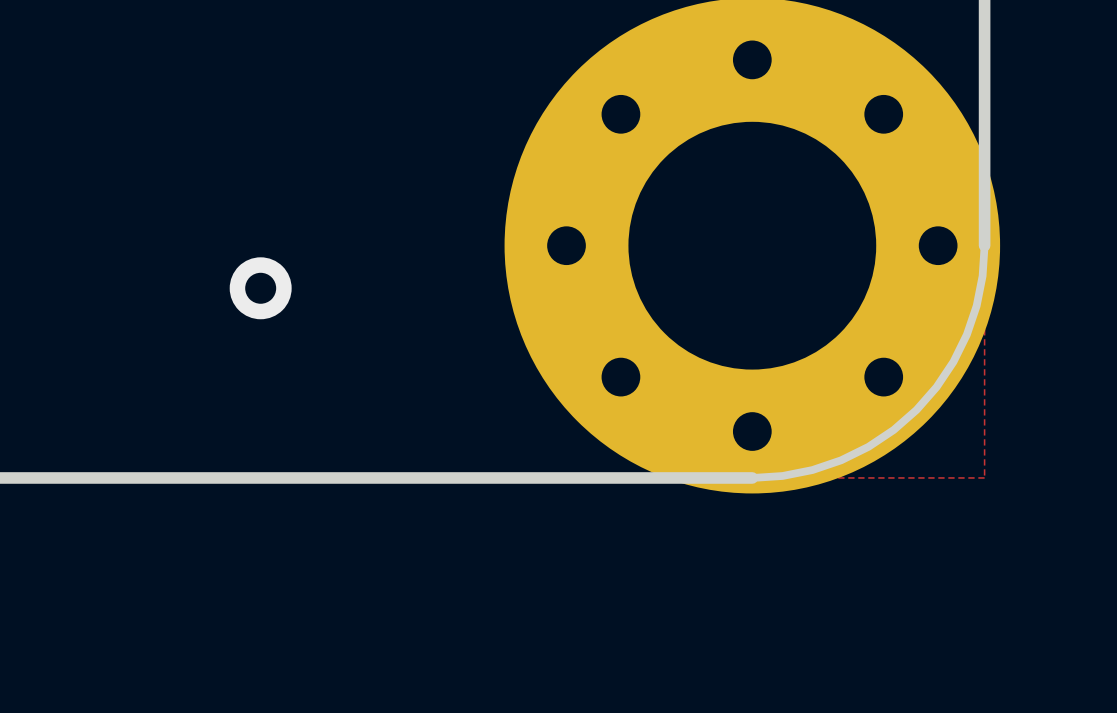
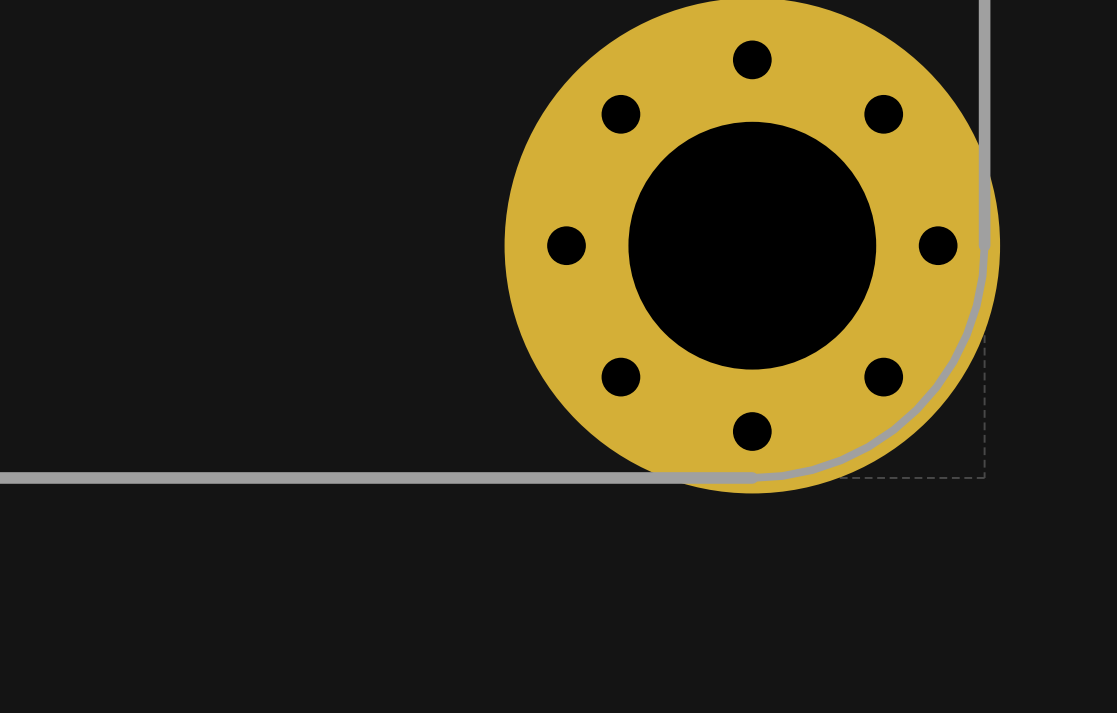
via: (260, 288) -> none

